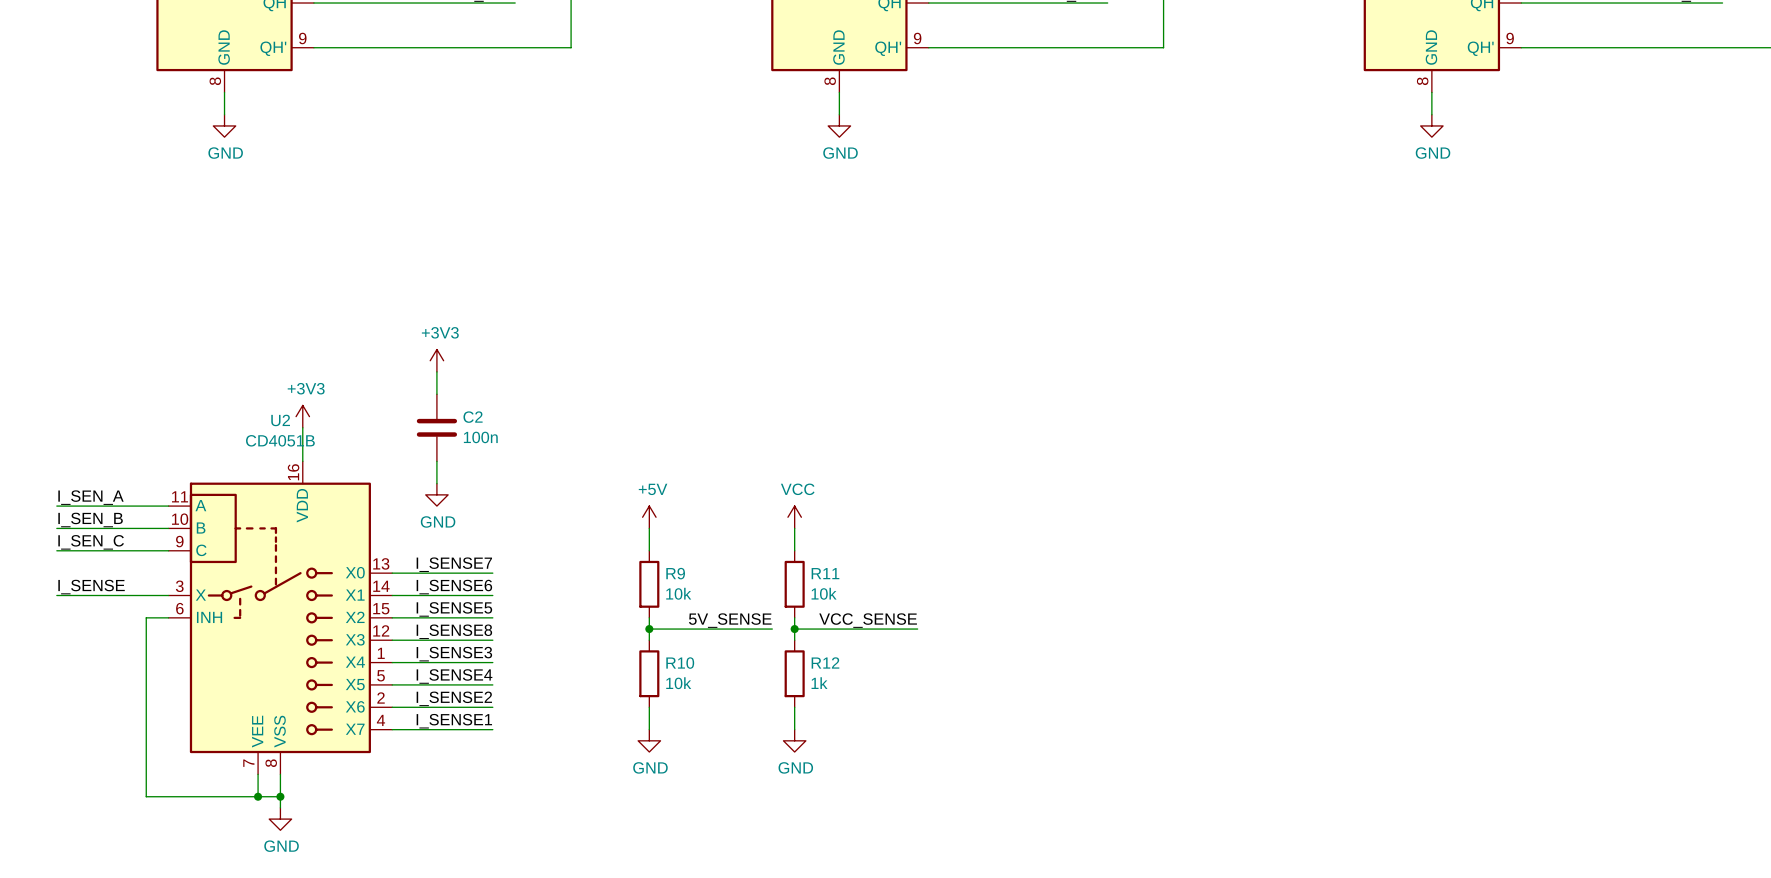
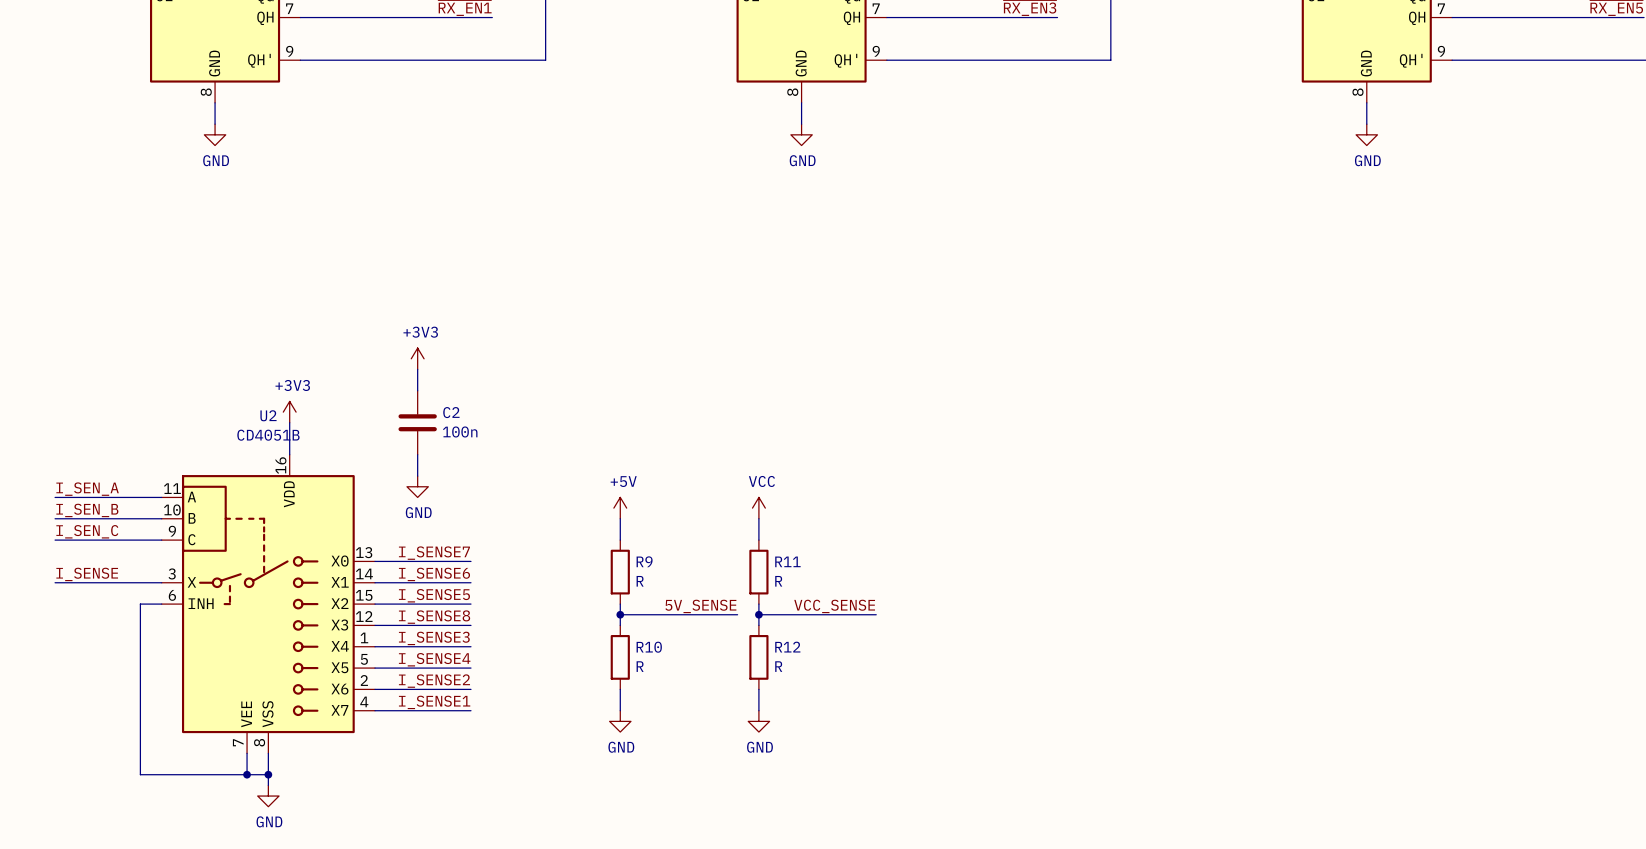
R9 value: 10k (678, 593) -> R (640, 581)
R11 value: 10k (824, 593) -> R (778, 581)
R10 value: 10k (678, 683) -> R (640, 666)
R12 value: 1k (819, 683) -> R (778, 666)

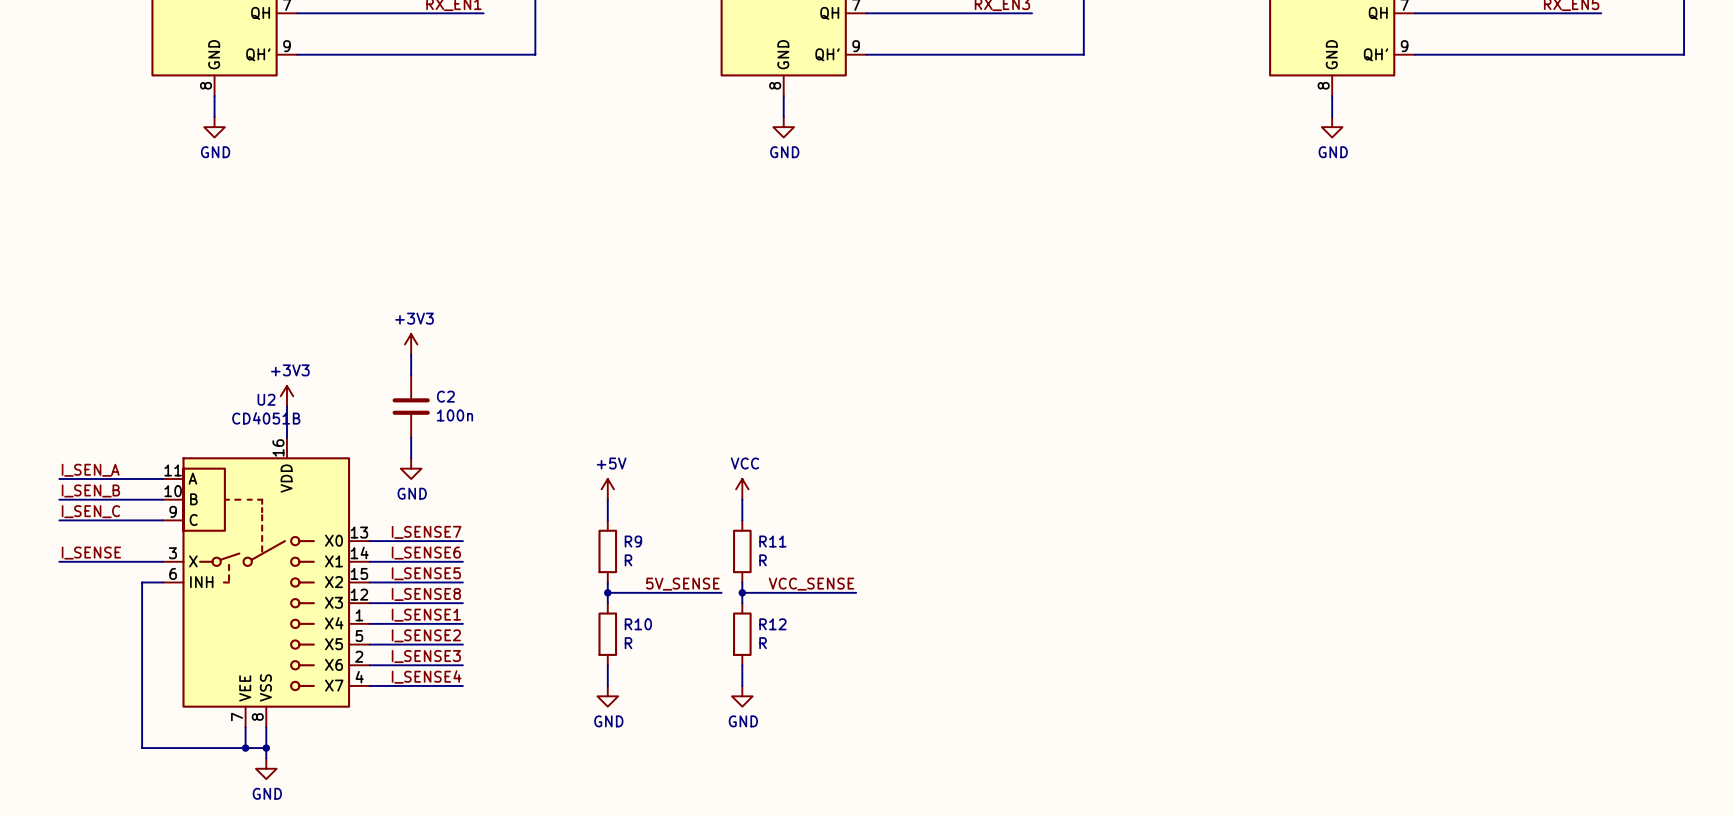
label: I_SENSE3 (434, 638) -> I_SENSE1 (426, 615)
label: I_SENSE4 (434, 659) -> I_SENSE2 (426, 635)
label: I_SENSE2 (434, 681) -> I_SENSE3 (426, 656)
label: I_SENSE1 (434, 702) -> I_SENSE4 (426, 676)

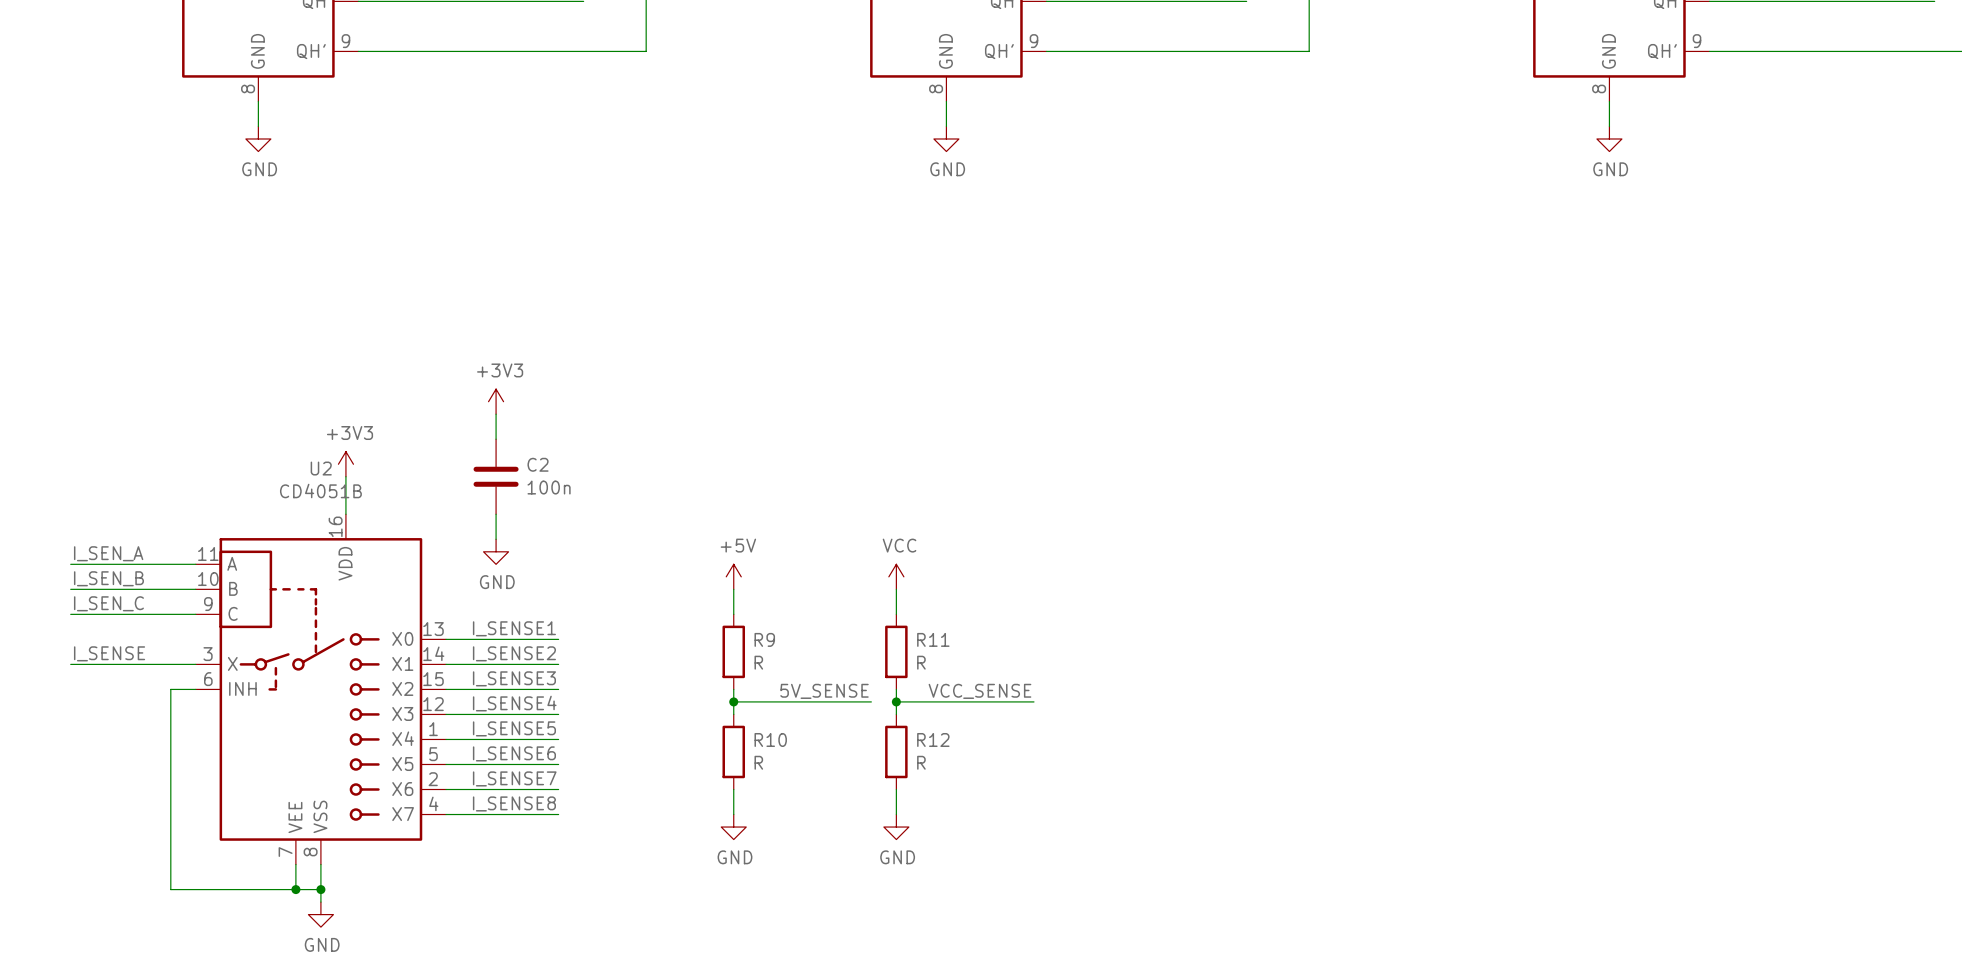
label: I_SENSE7 (426, 532) -> I_SENSE1 (514, 628)
label: I_SENSE6 (426, 553) -> I_SENSE2 (514, 653)
label: I_SENSE5 (426, 573) -> I_SENSE3 (514, 678)
label: I_SENSE8 (426, 594) -> I_SENSE4 (514, 703)
label: I_SENSE1 (426, 615) -> I_SENSE5 (514, 728)
label: I_SENSE2 (426, 635) -> I_SENSE6 (514, 753)
label: I_SENSE3 (426, 656) -> I_SENSE7 (514, 778)
label: I_SENSE4 (426, 676) -> I_SENSE8 (514, 803)

